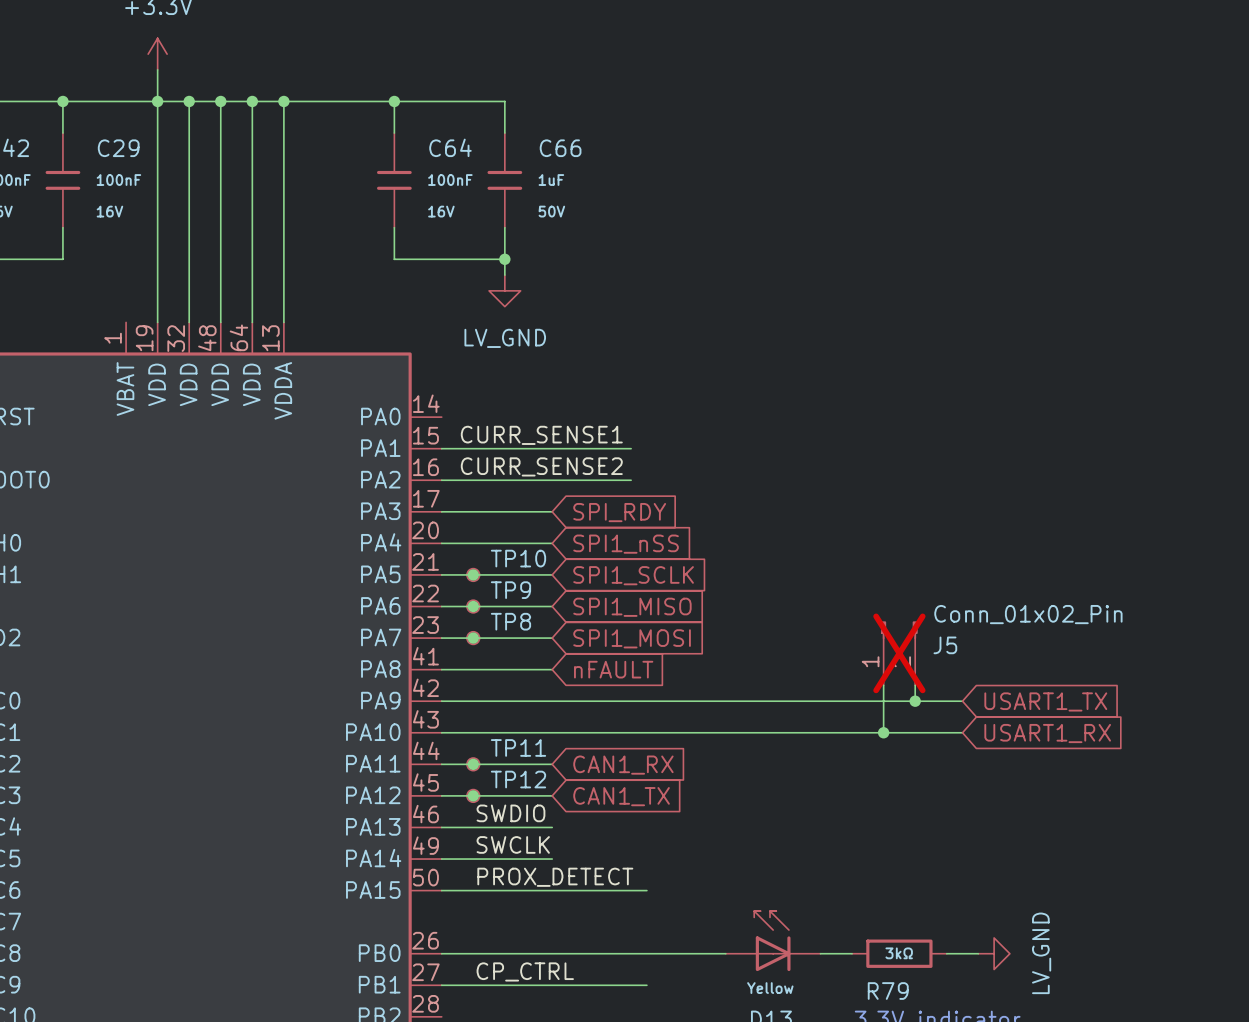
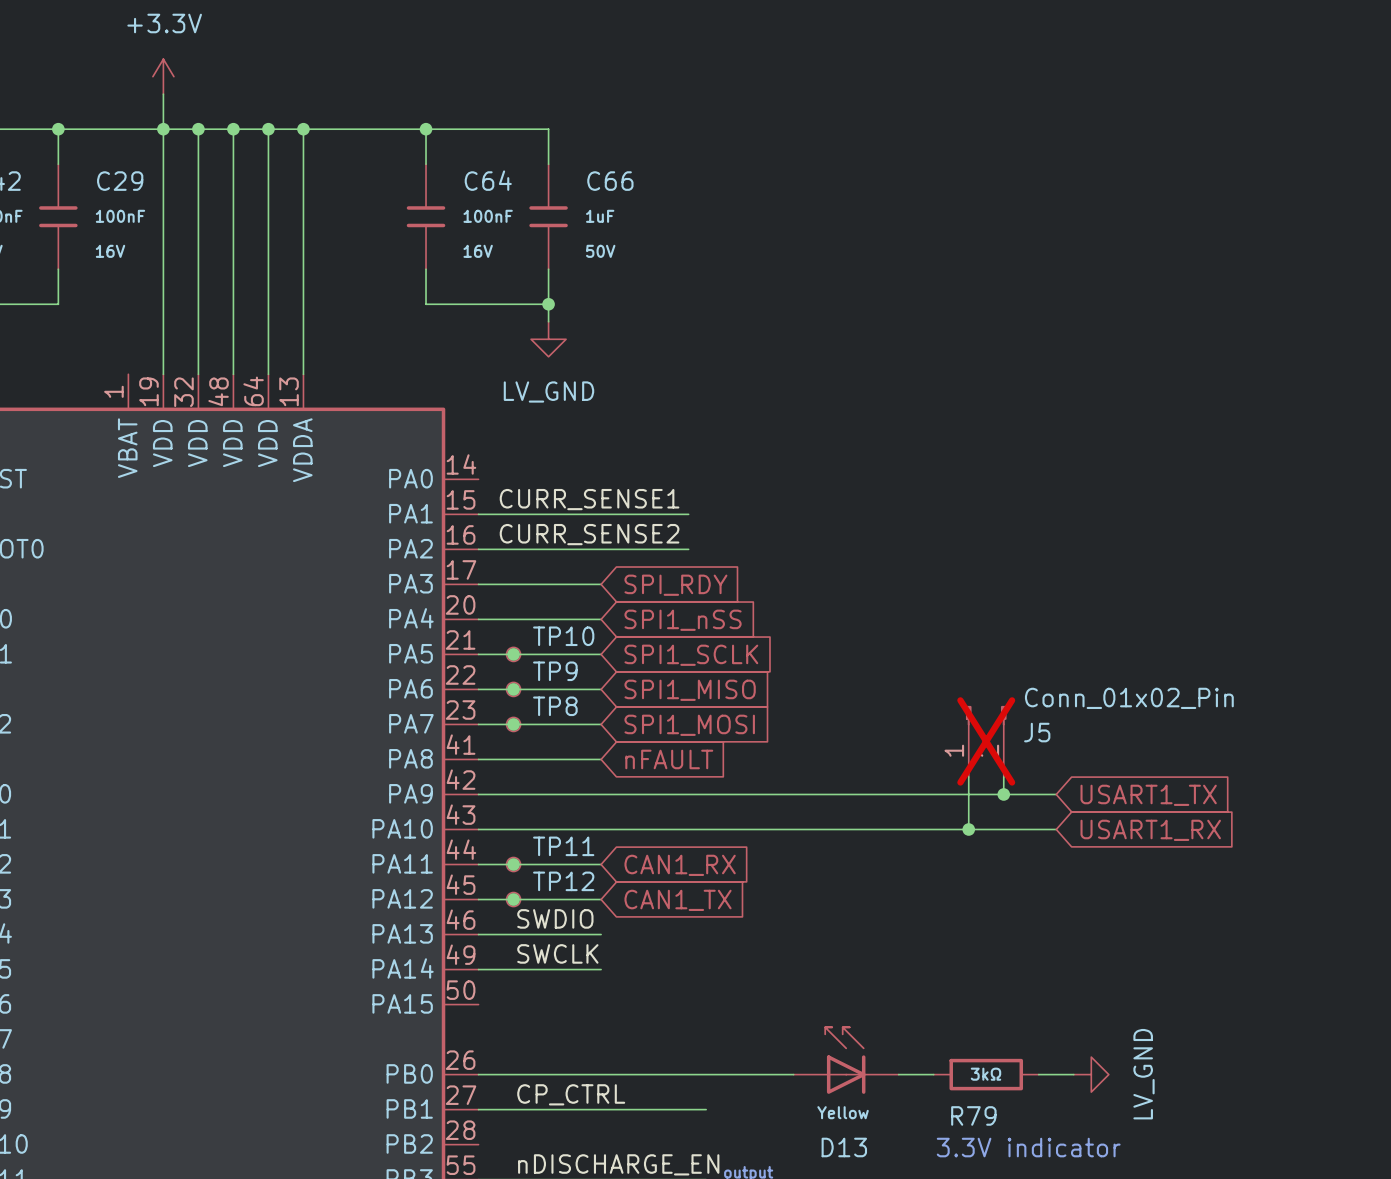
label: PROX_DETECT (555, 877) -> none
wire: (441, 890) (646, 890) -> none

